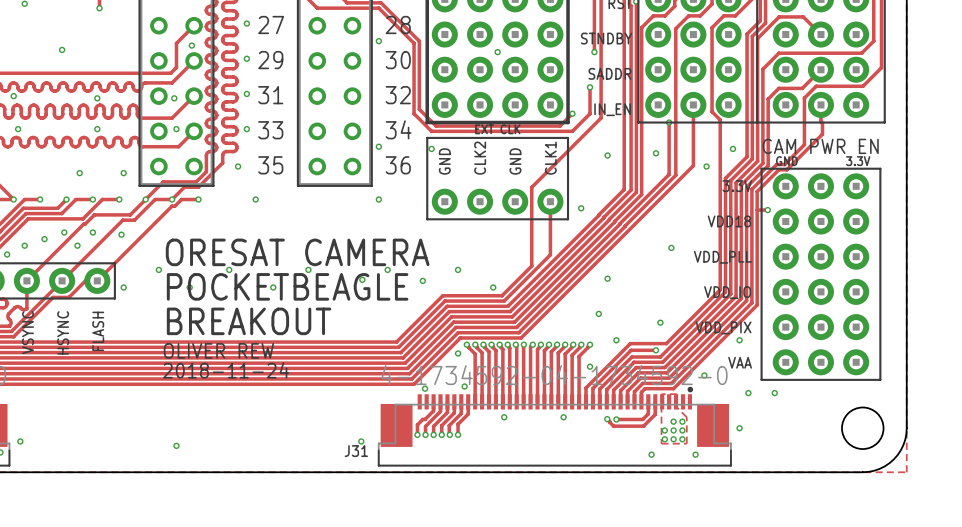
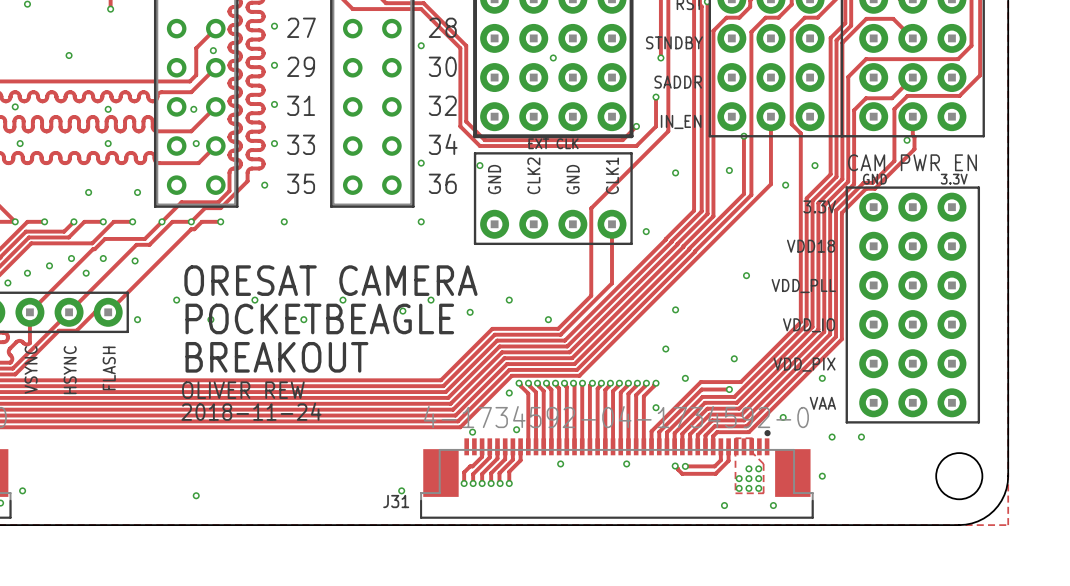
via: none -> (907, 140)
track: (757, 210) (767, 210) -> none
via: (767, 210) -> none

